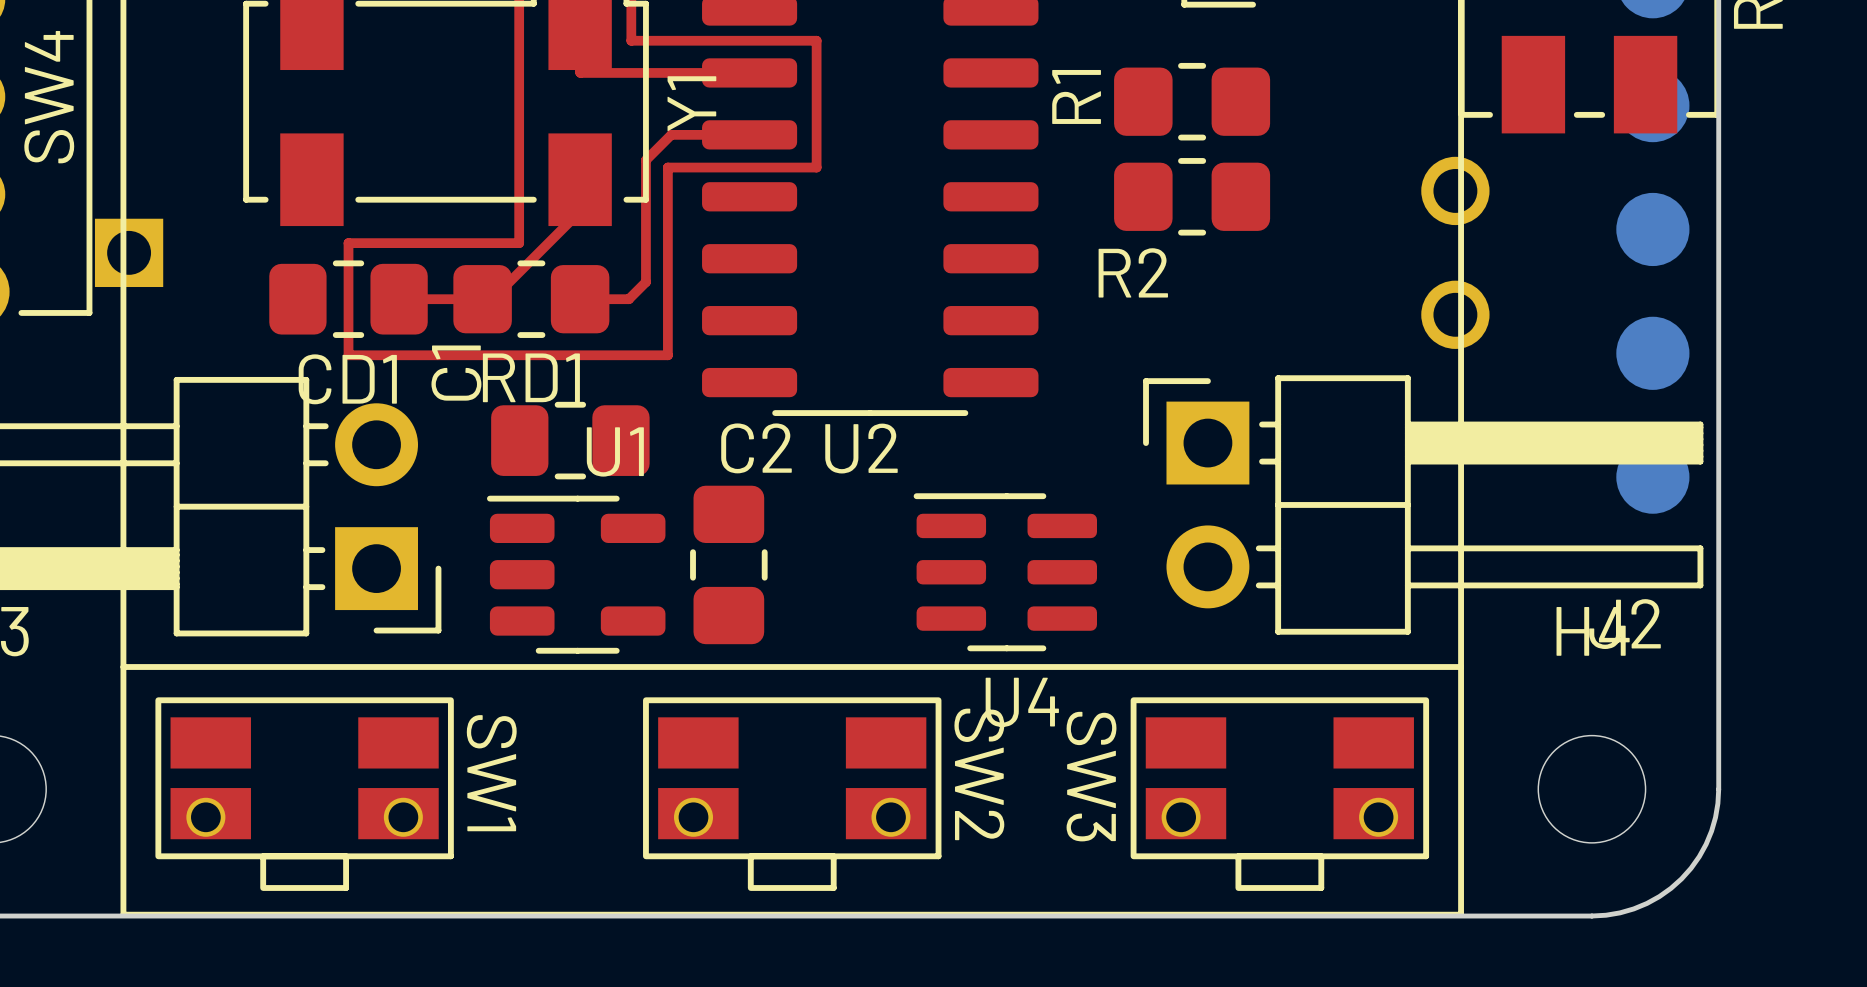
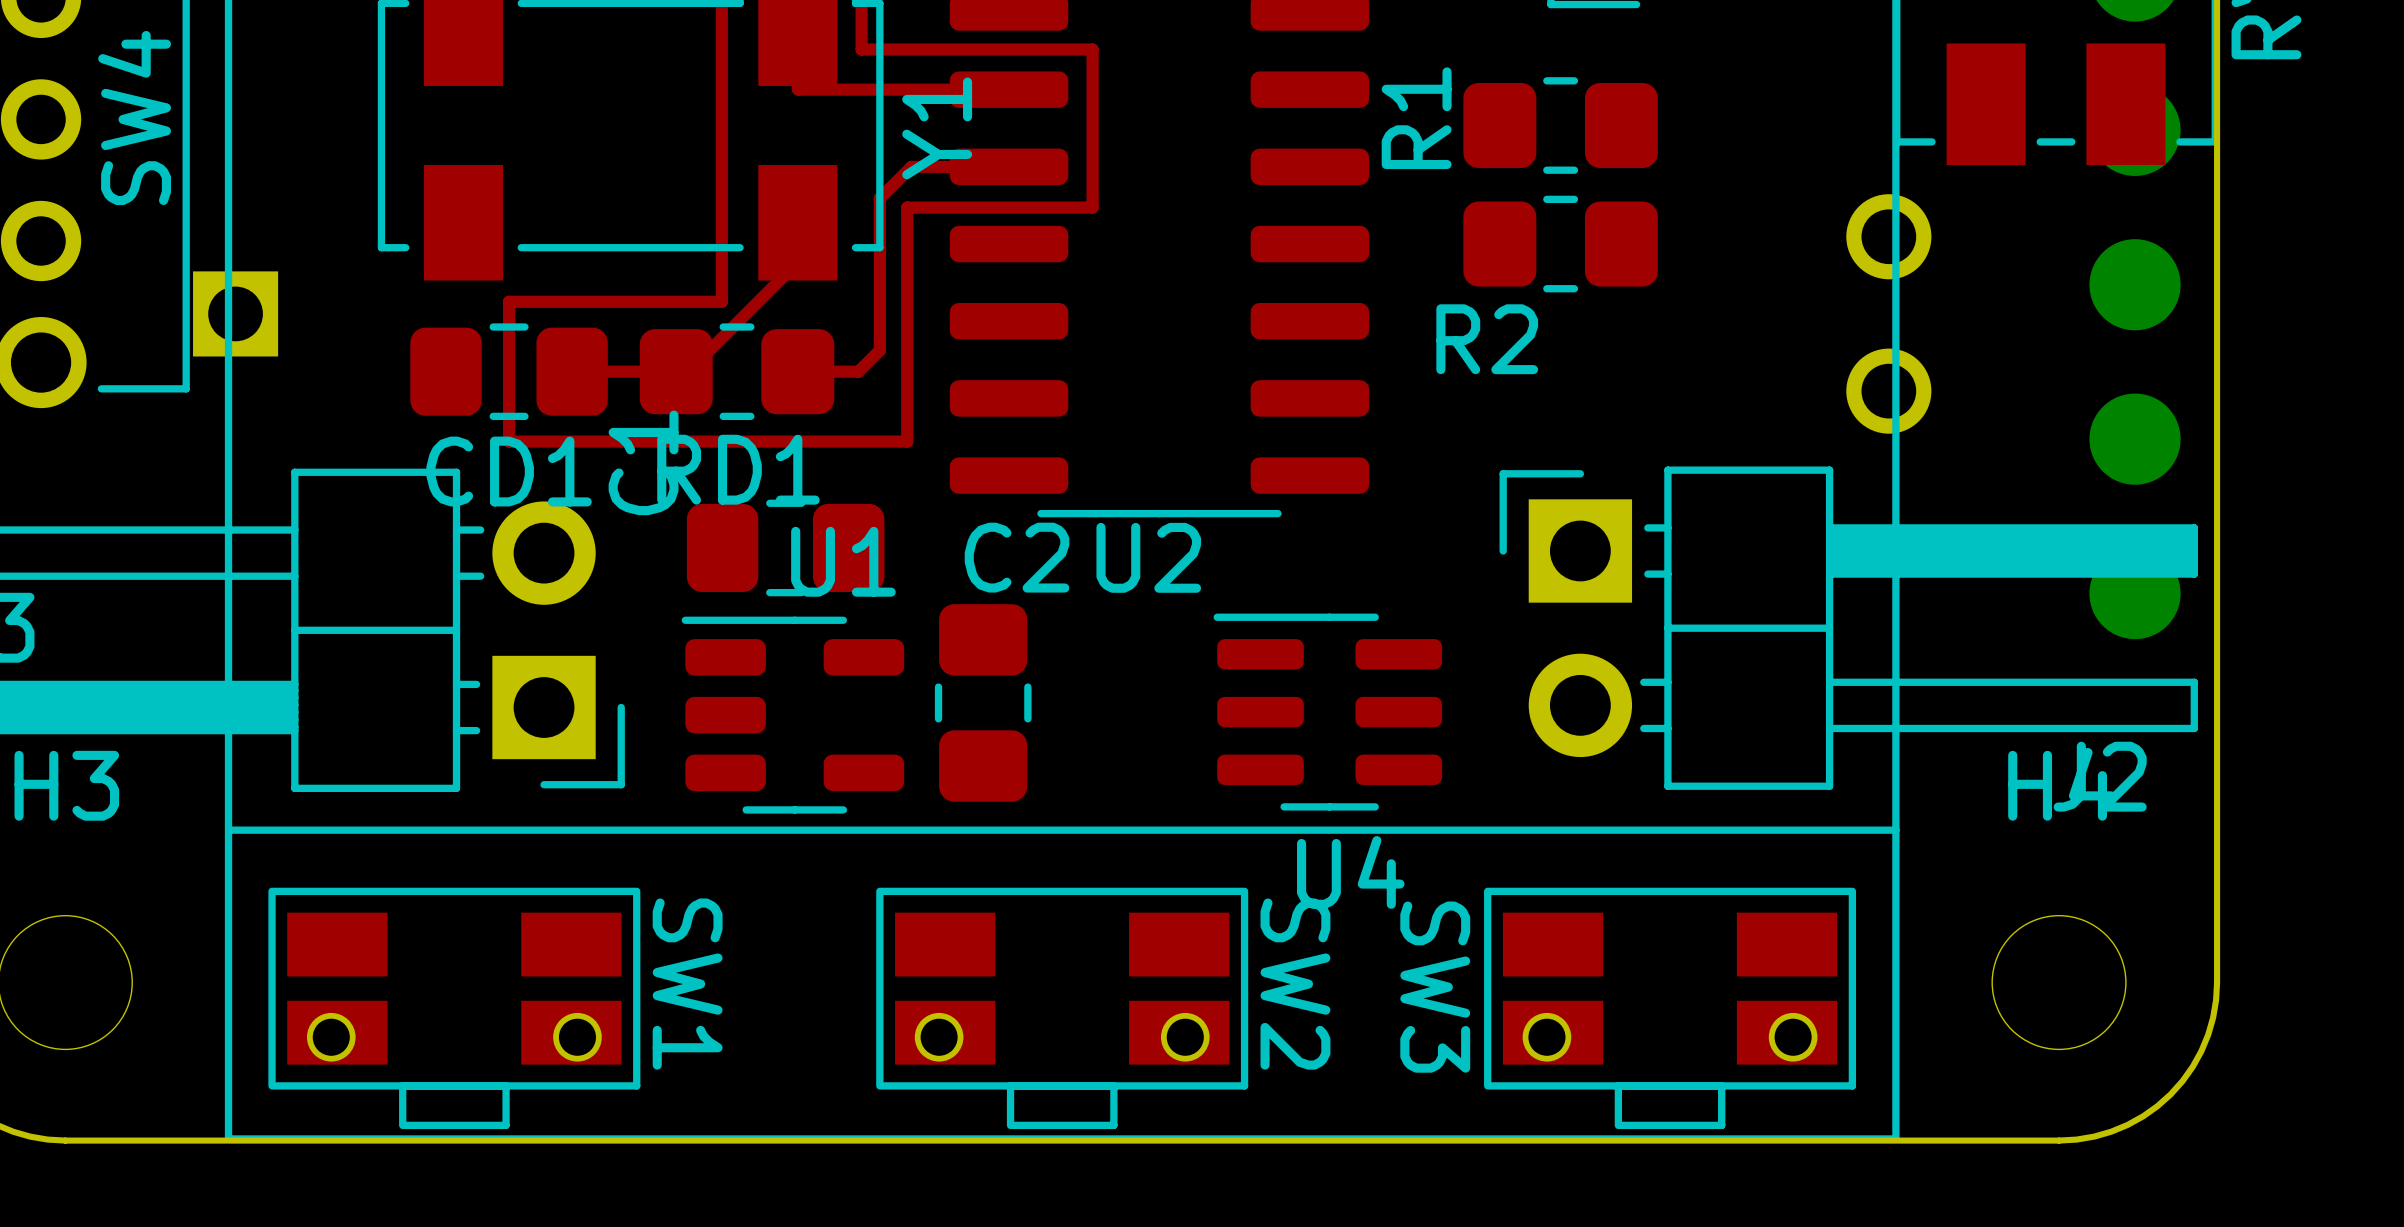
SW1 position: (304, 794) -> (454, 1008)
SW2 position: (792, 794) -> (1062, 1008)
SW3 position: (1279, 794) -> (1670, 1008)

